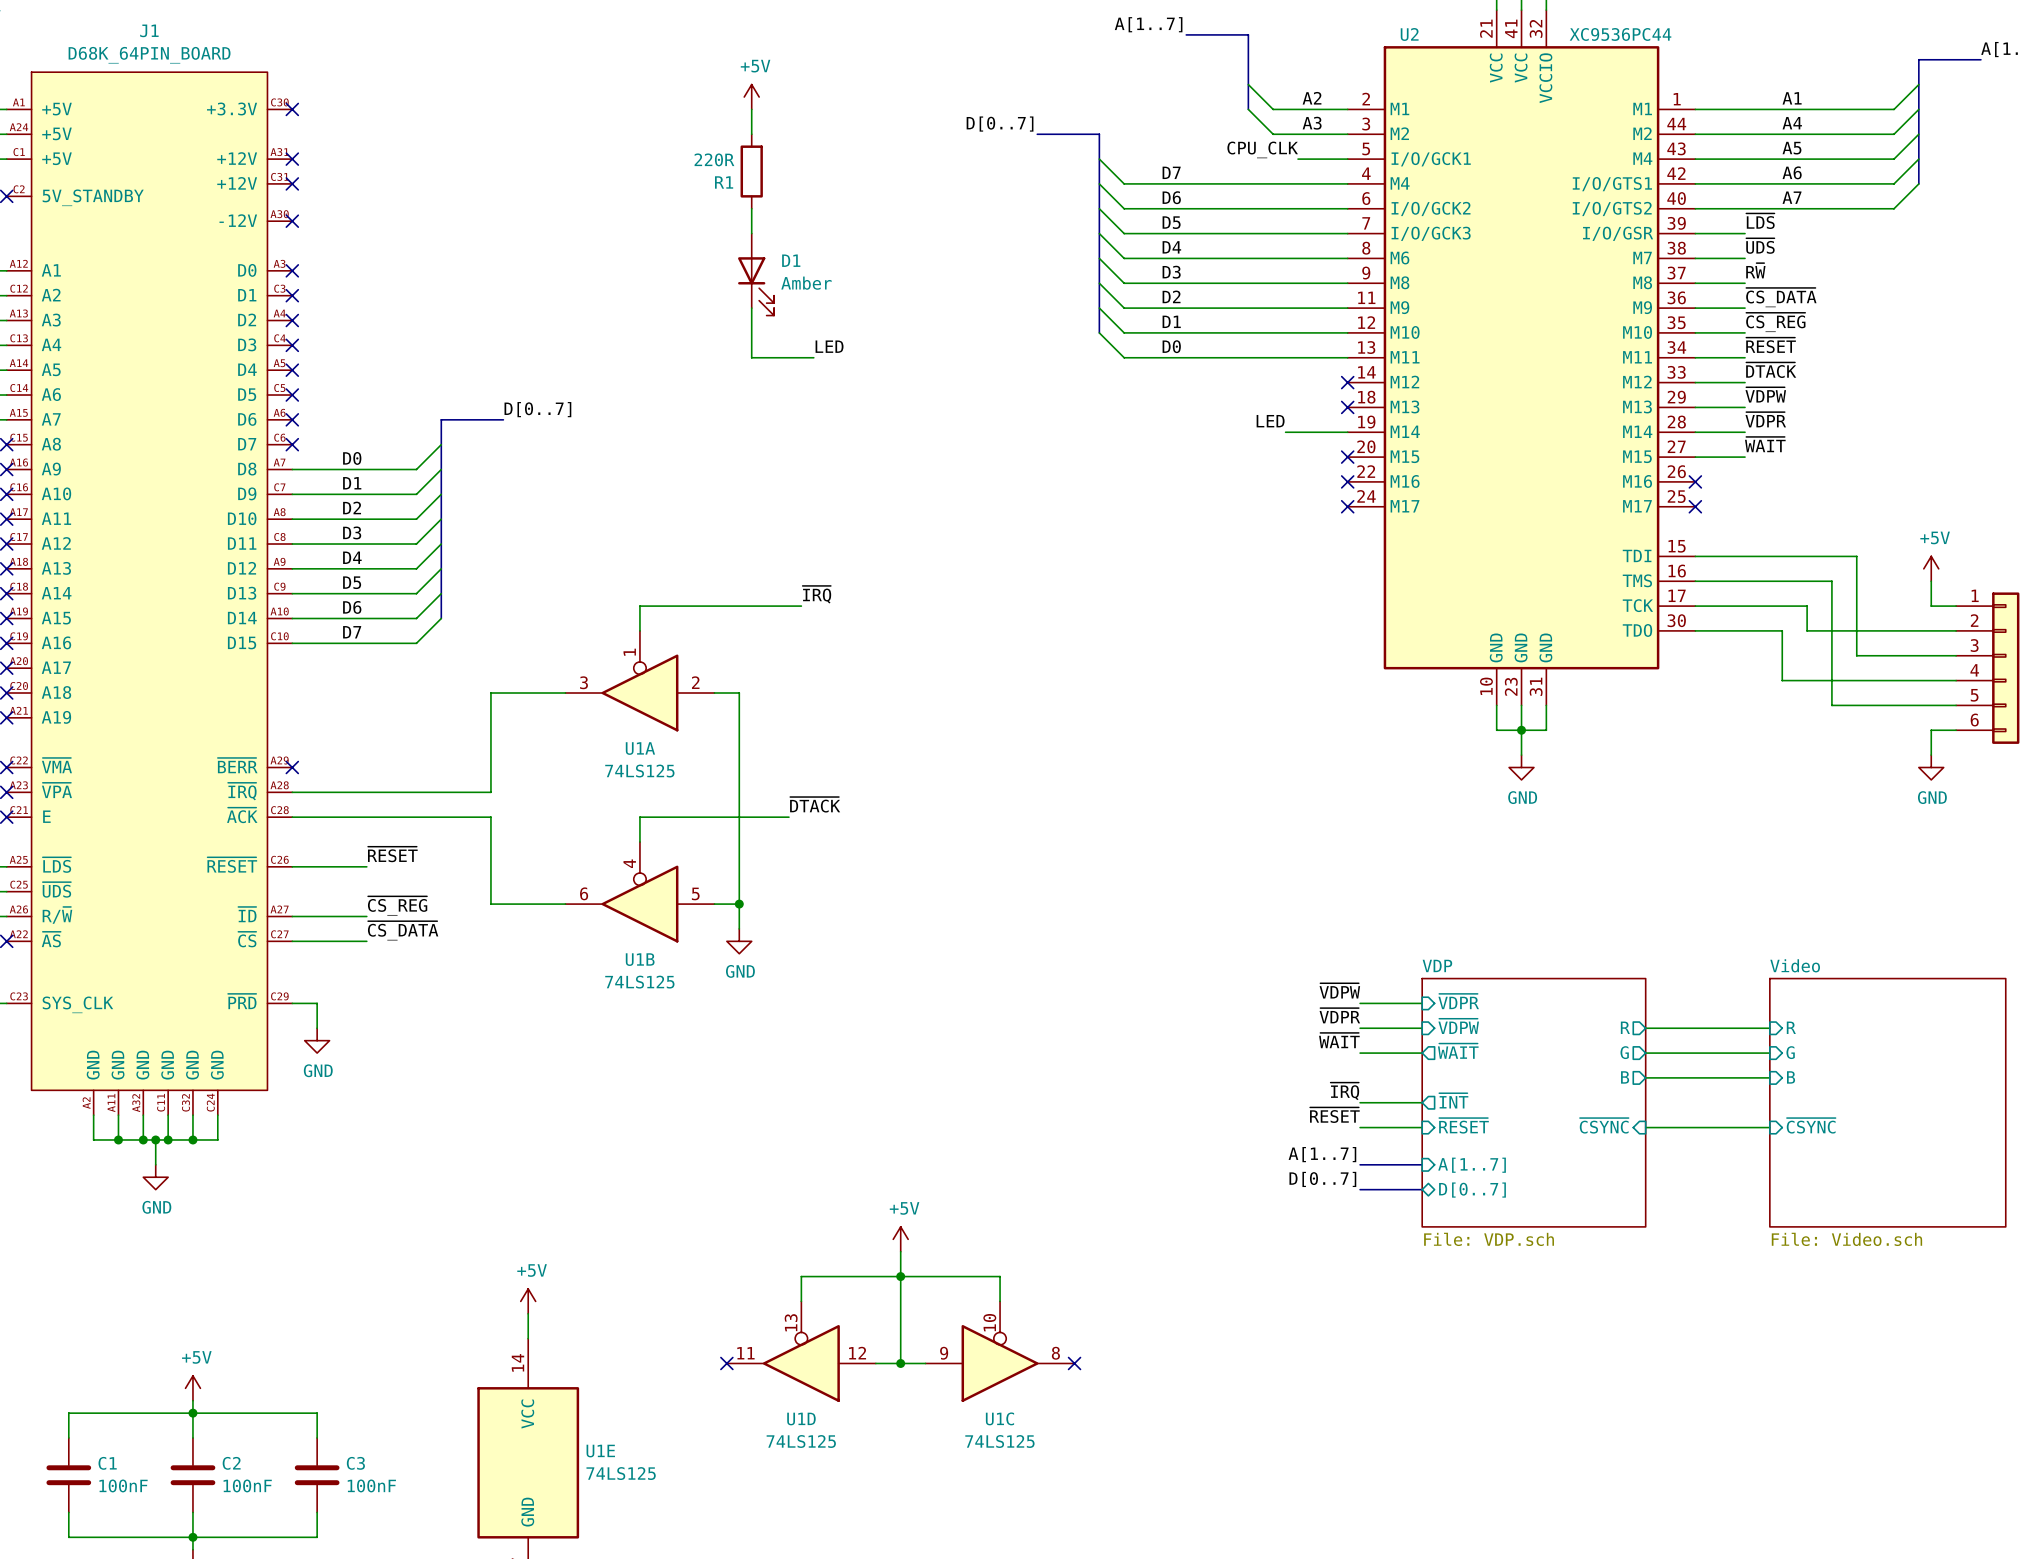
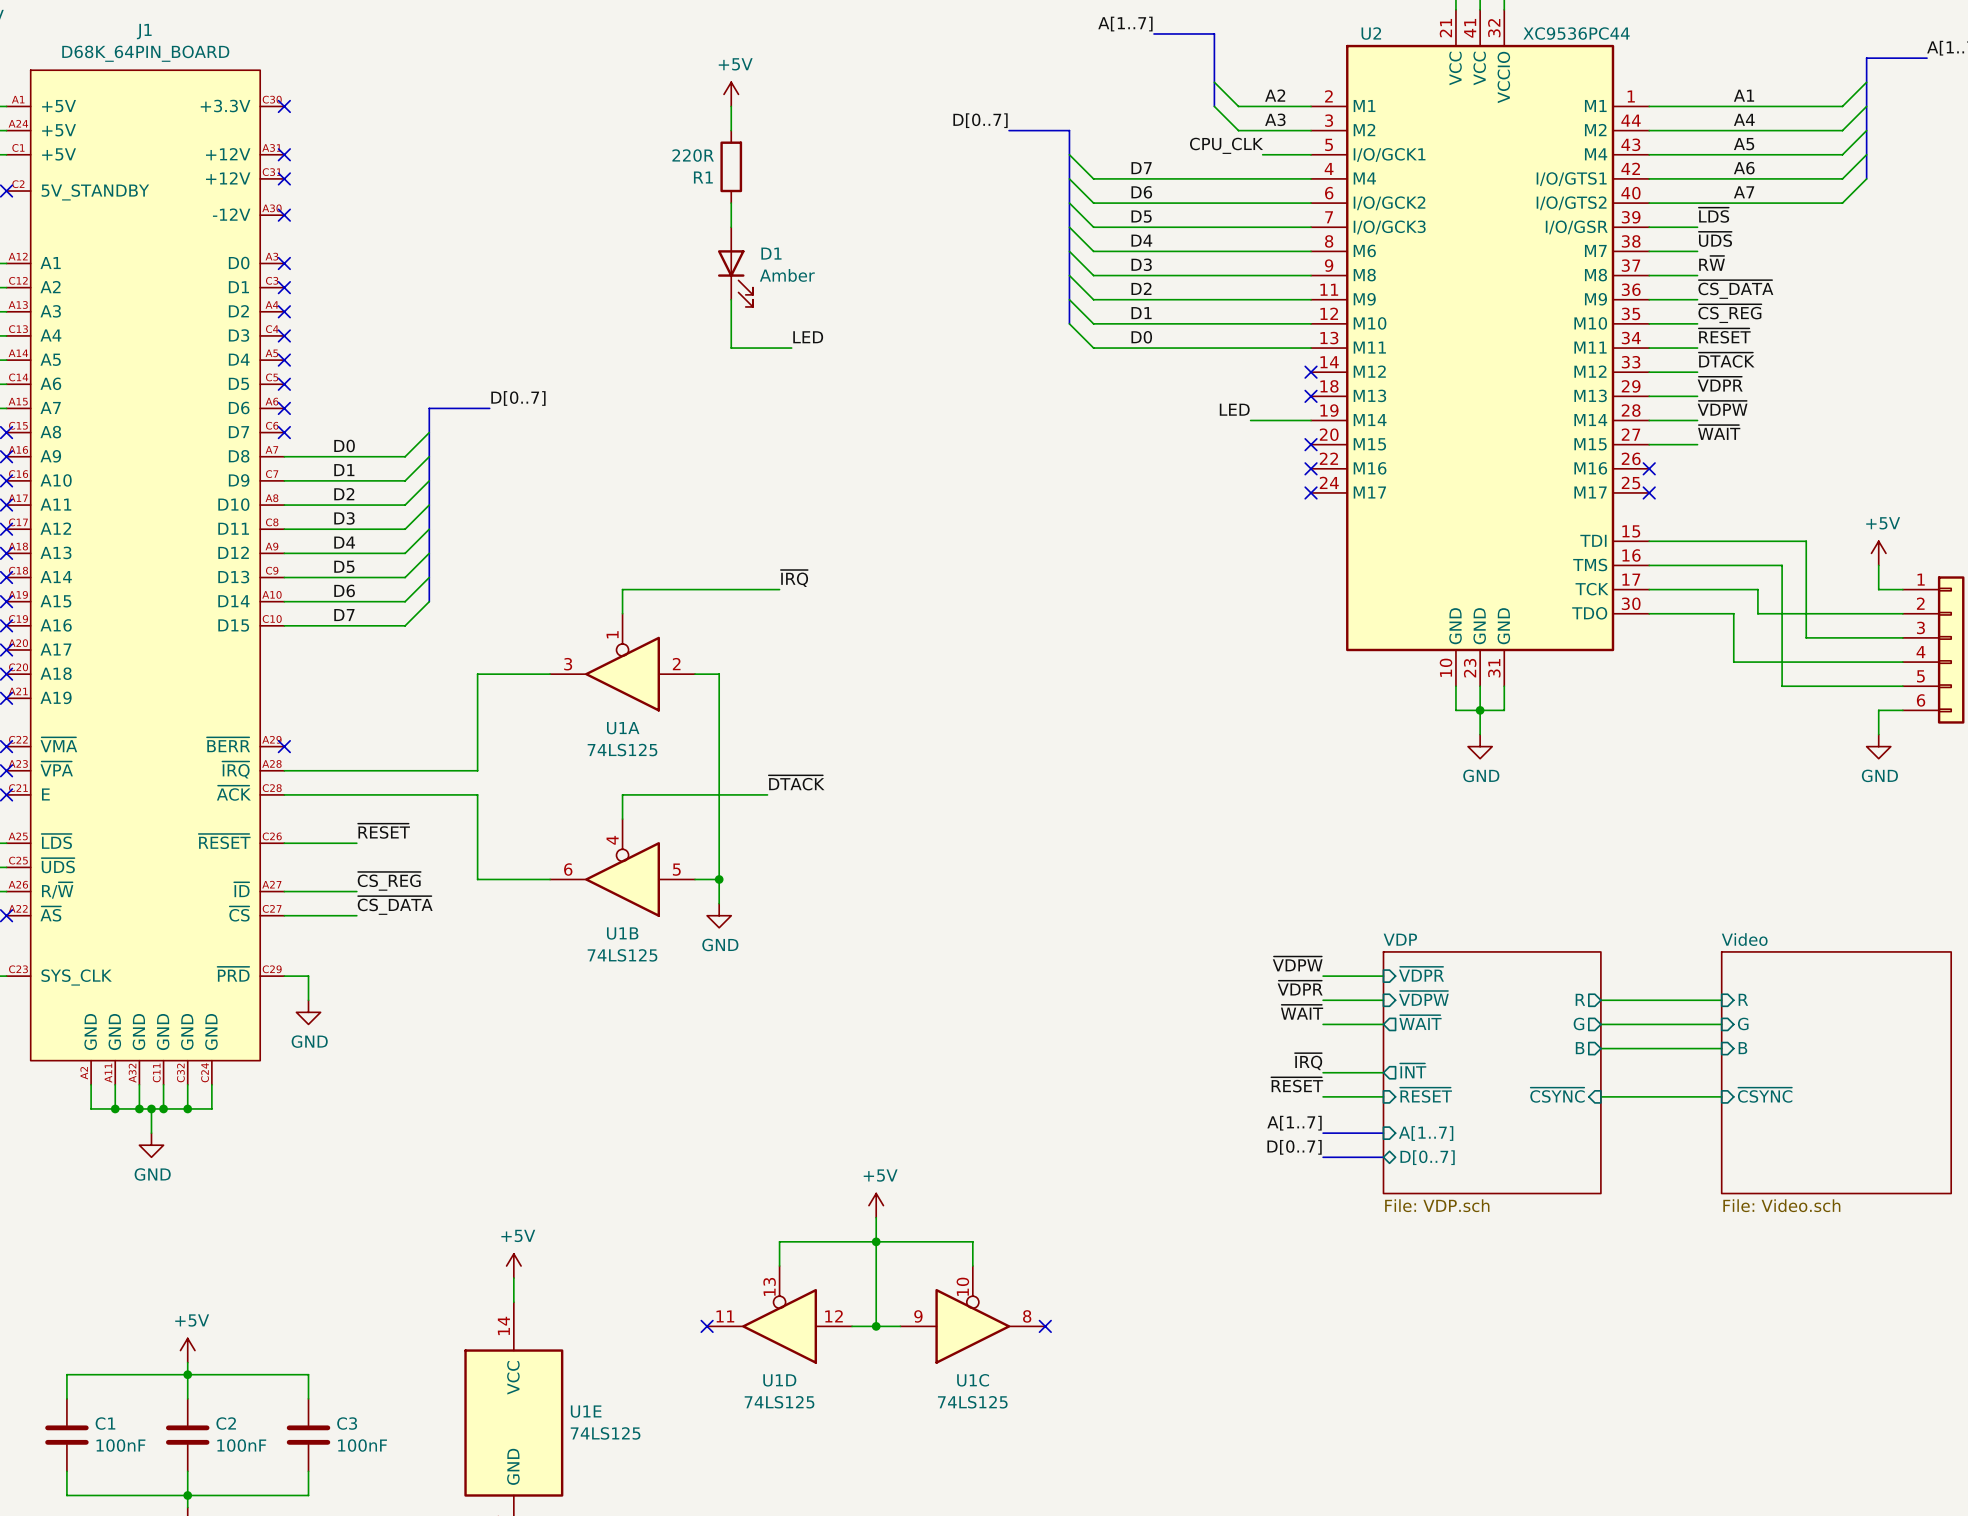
label: ~{VDPW} (1765, 394) -> ~{VDPR} (1720, 384)
label: ~{VDPR} (1765, 419) -> ~{VDPW} (1722, 408)

